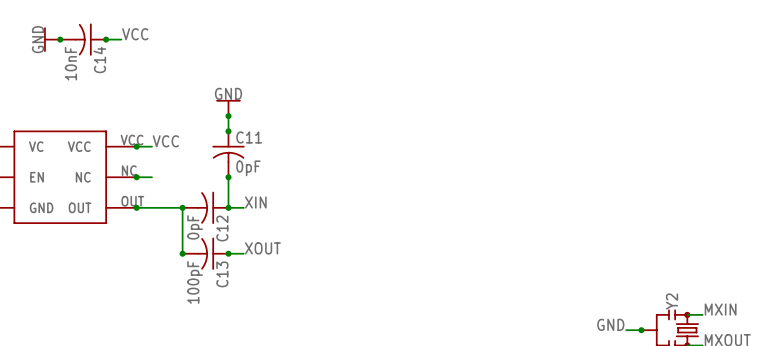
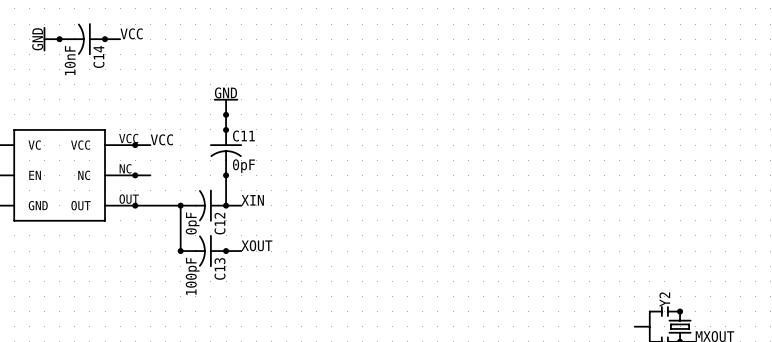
label: MXIN (720, 309) -> none
wire: (687, 314) (702, 314) -> none
label: GND (610, 324) -> none
wire: (626, 330) (641, 330) -> none
junction: (641, 330) -> none

